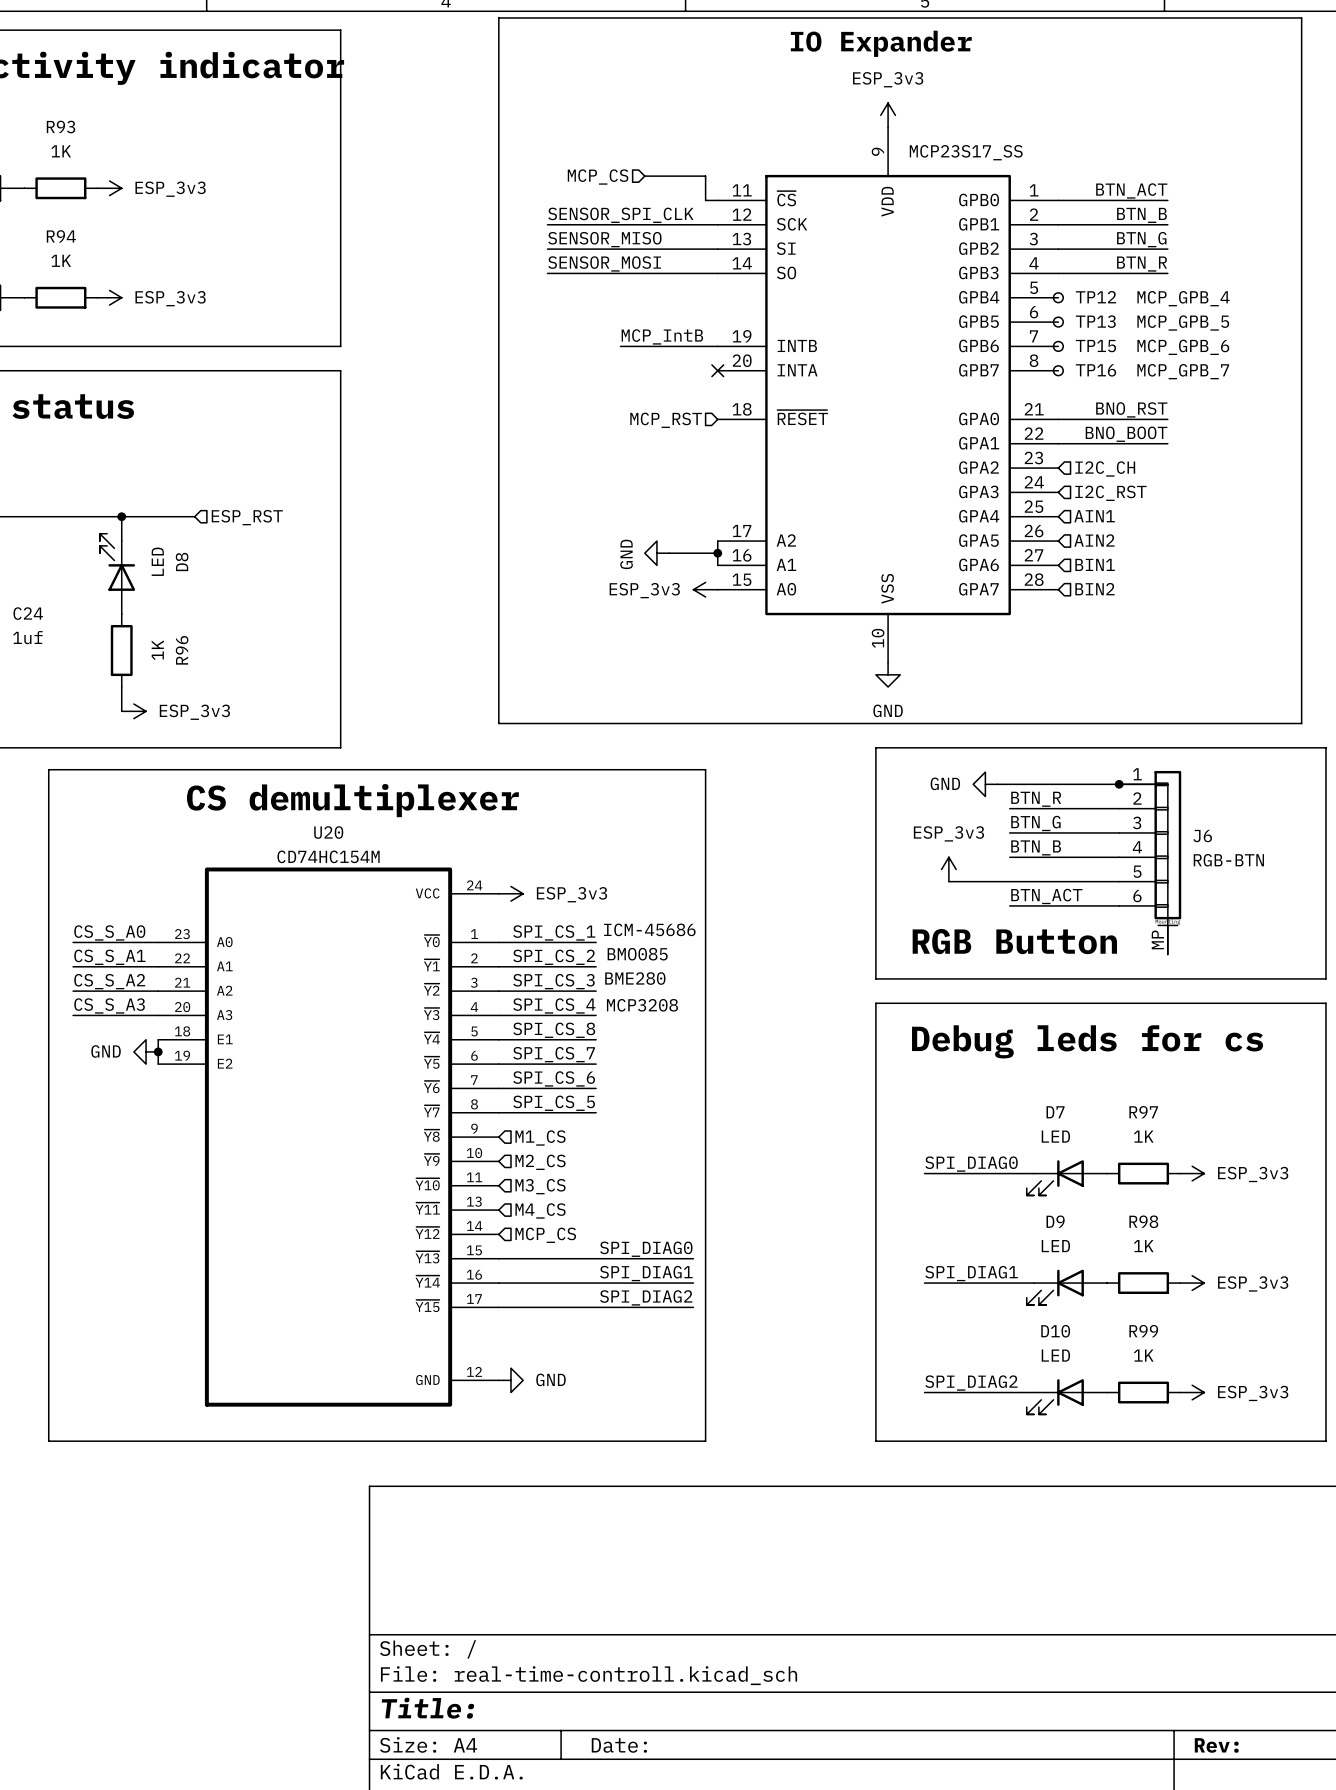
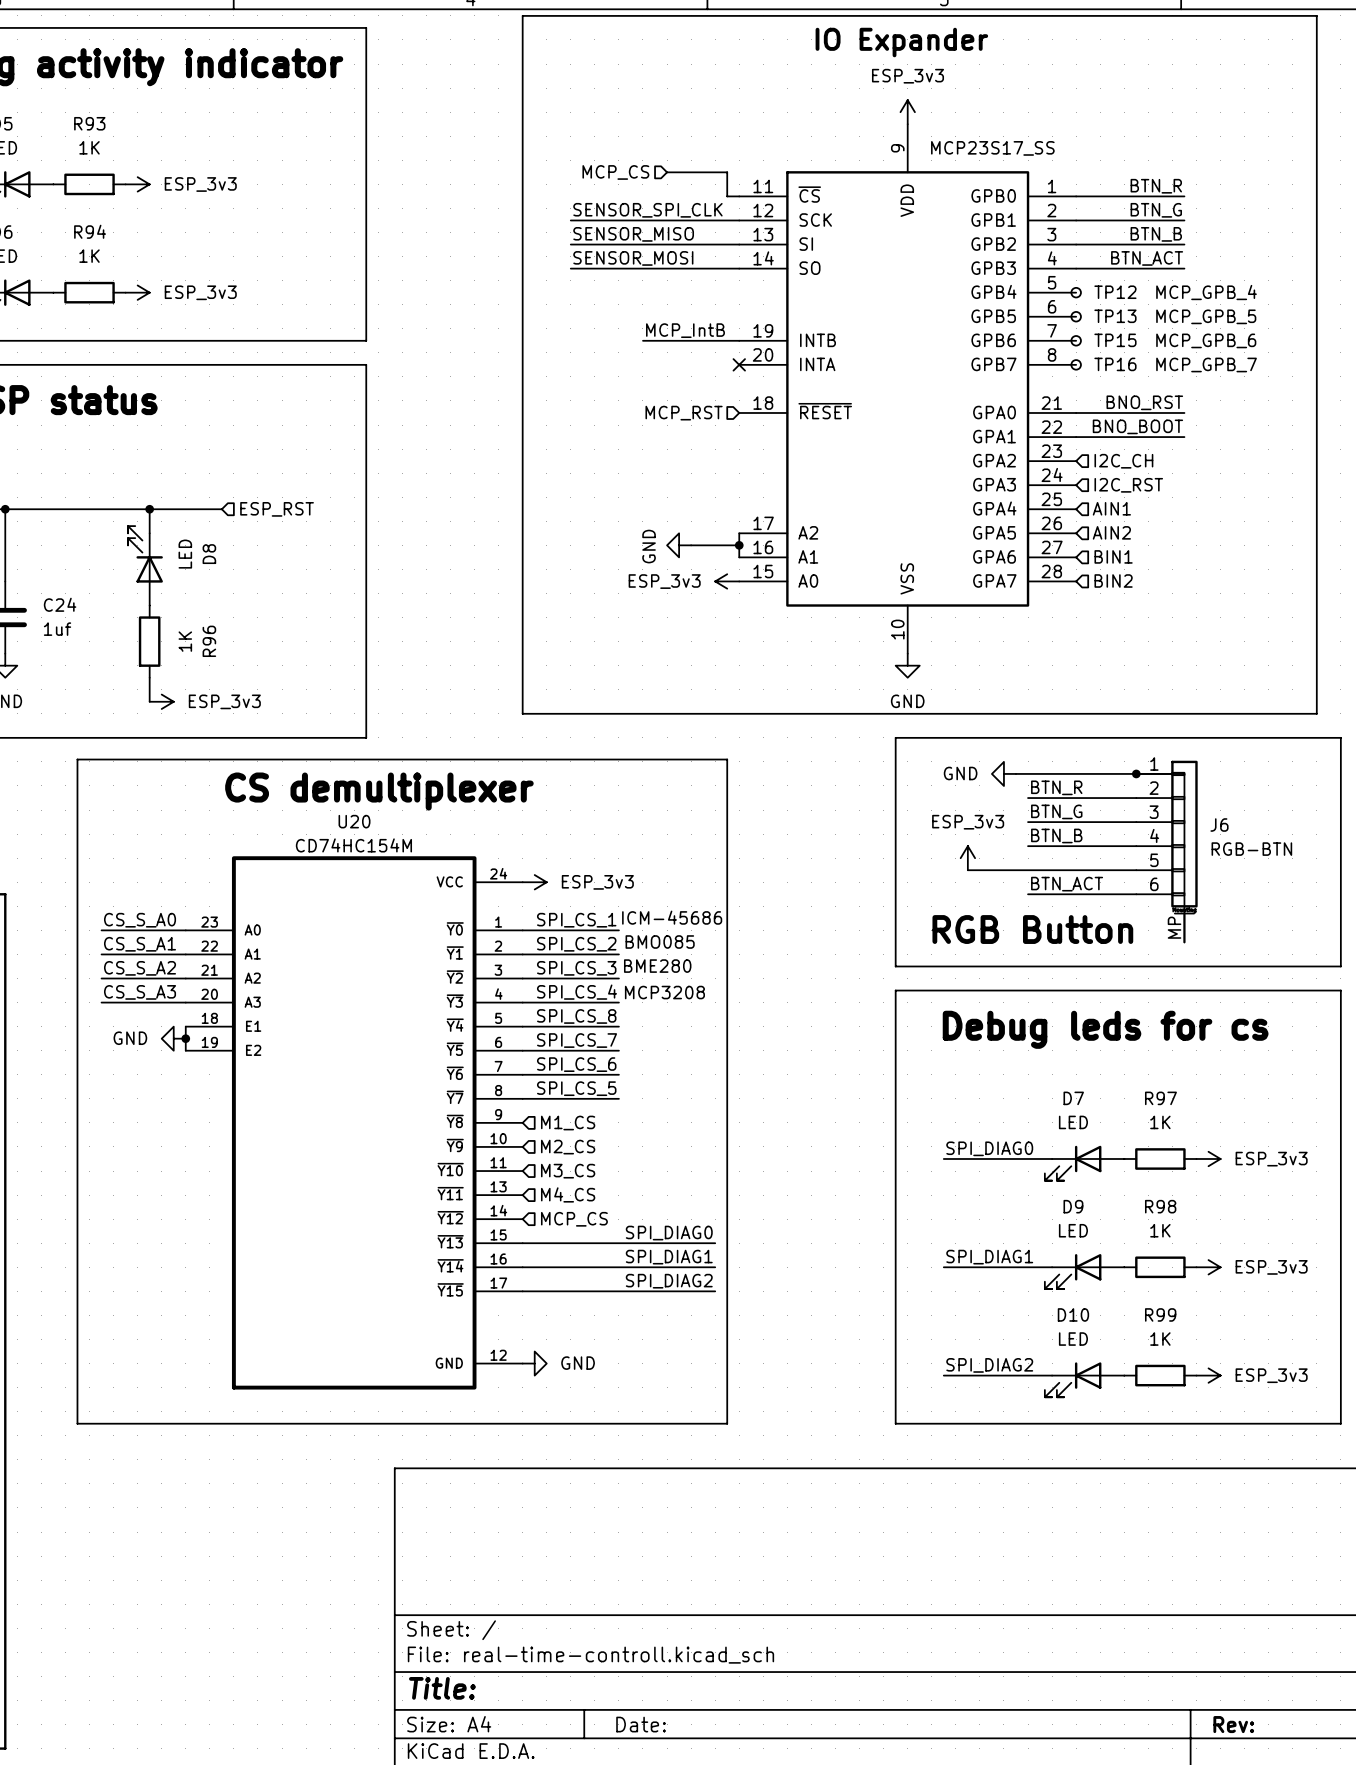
label: BTN_ACT (1131, 190) -> BTN_R (1156, 186)
label: BTN_B (1141, 215) -> BTN_G (1156, 210)
label: BTN_G (1141, 239) -> BTN_B (1156, 234)
label: BTN_R (1142, 264) -> BTN_ACT (1147, 258)

